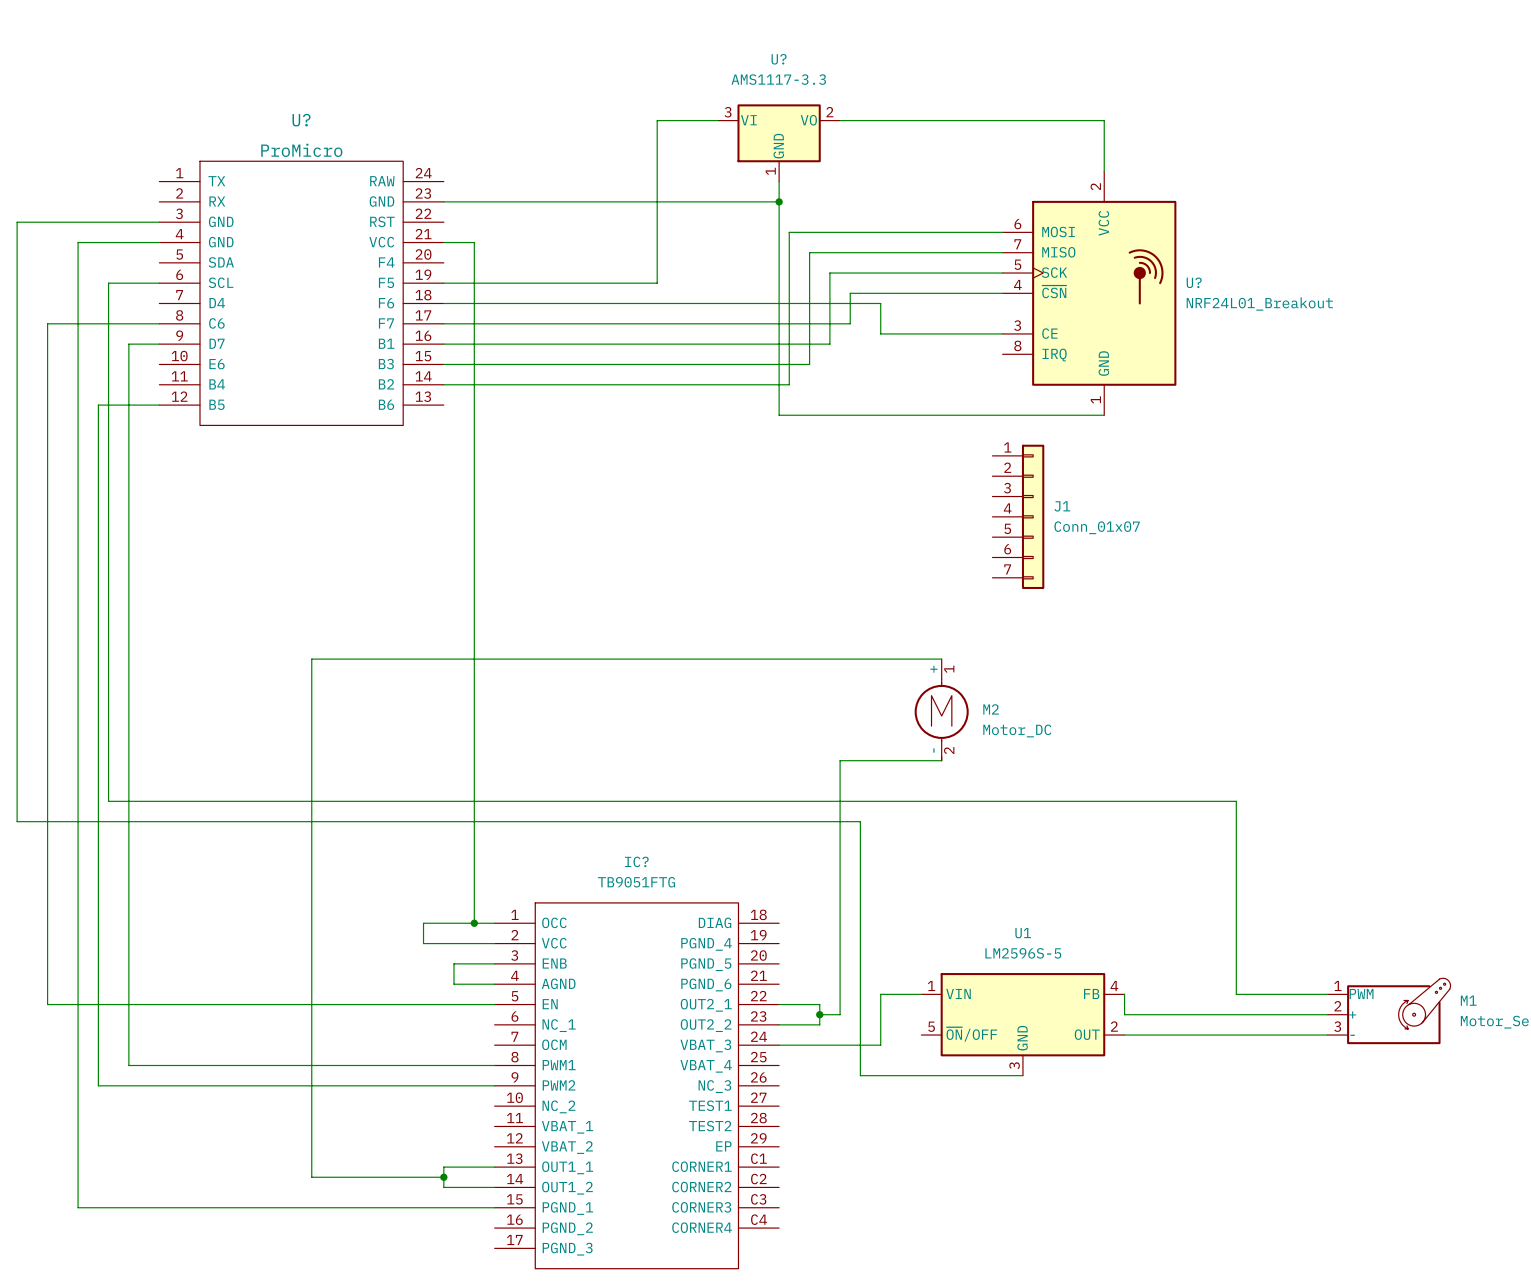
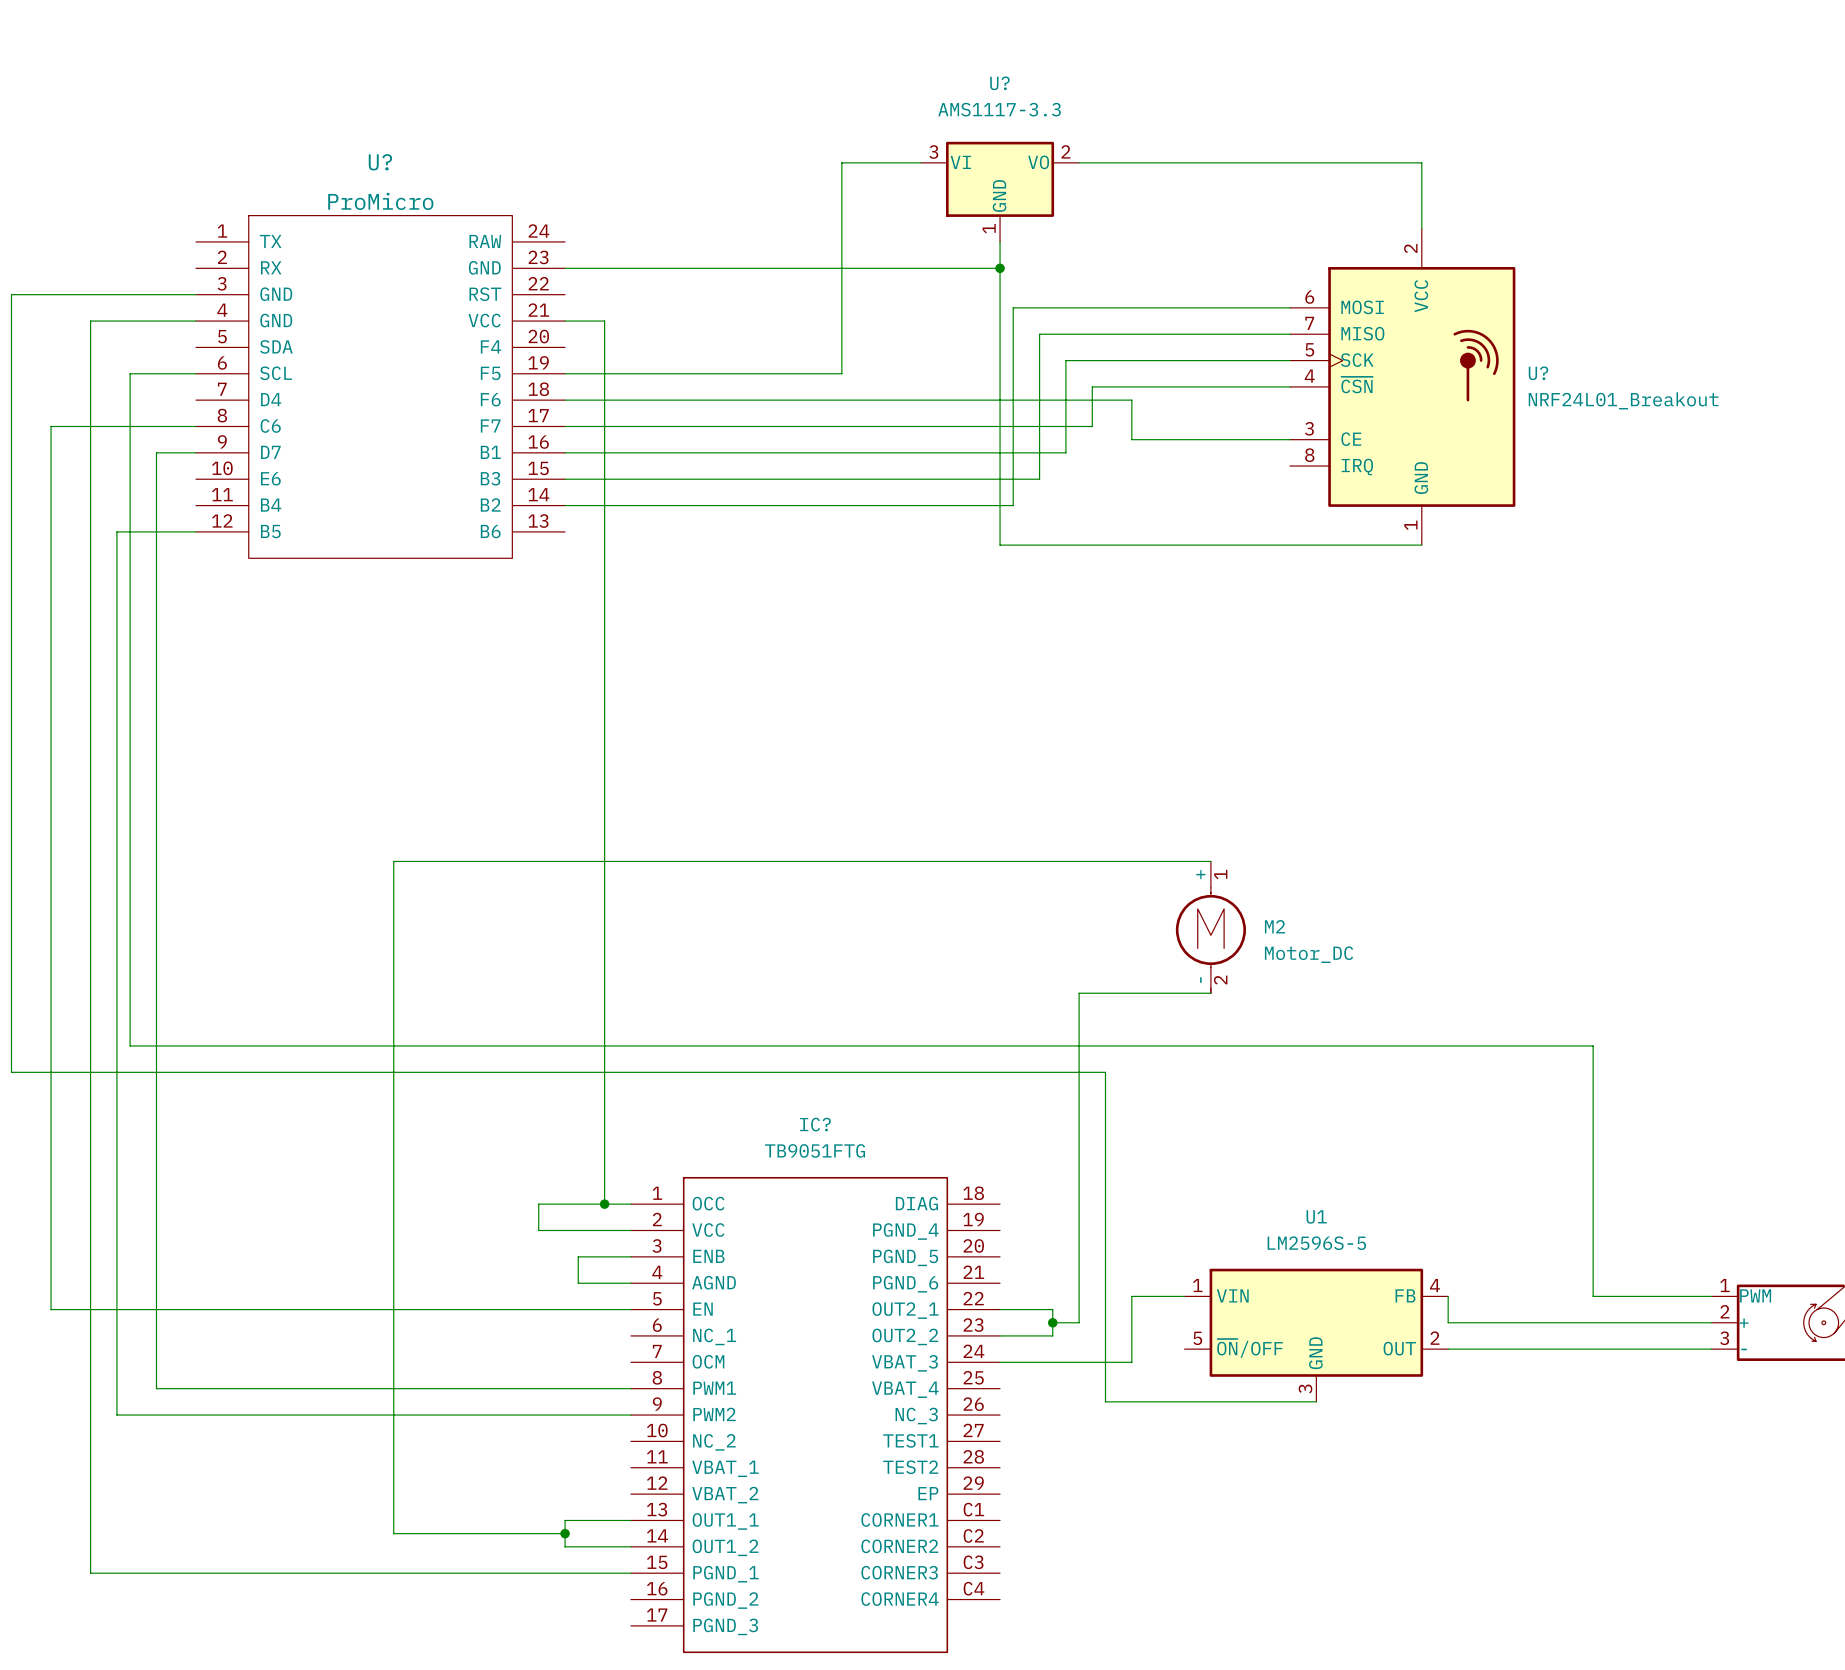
J1: Conn_01x07 (1018, 516) -> none

